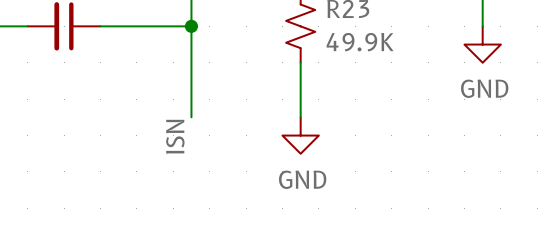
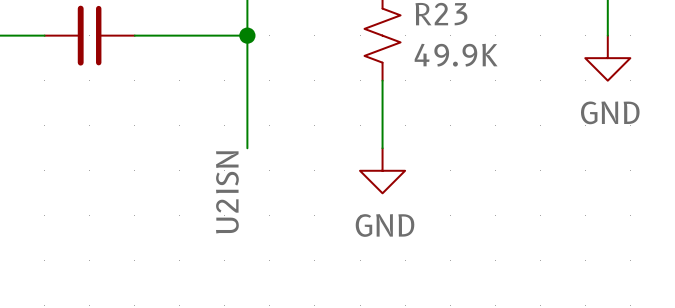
label: ISN (175, 136) -> U2ISN (227, 192)

